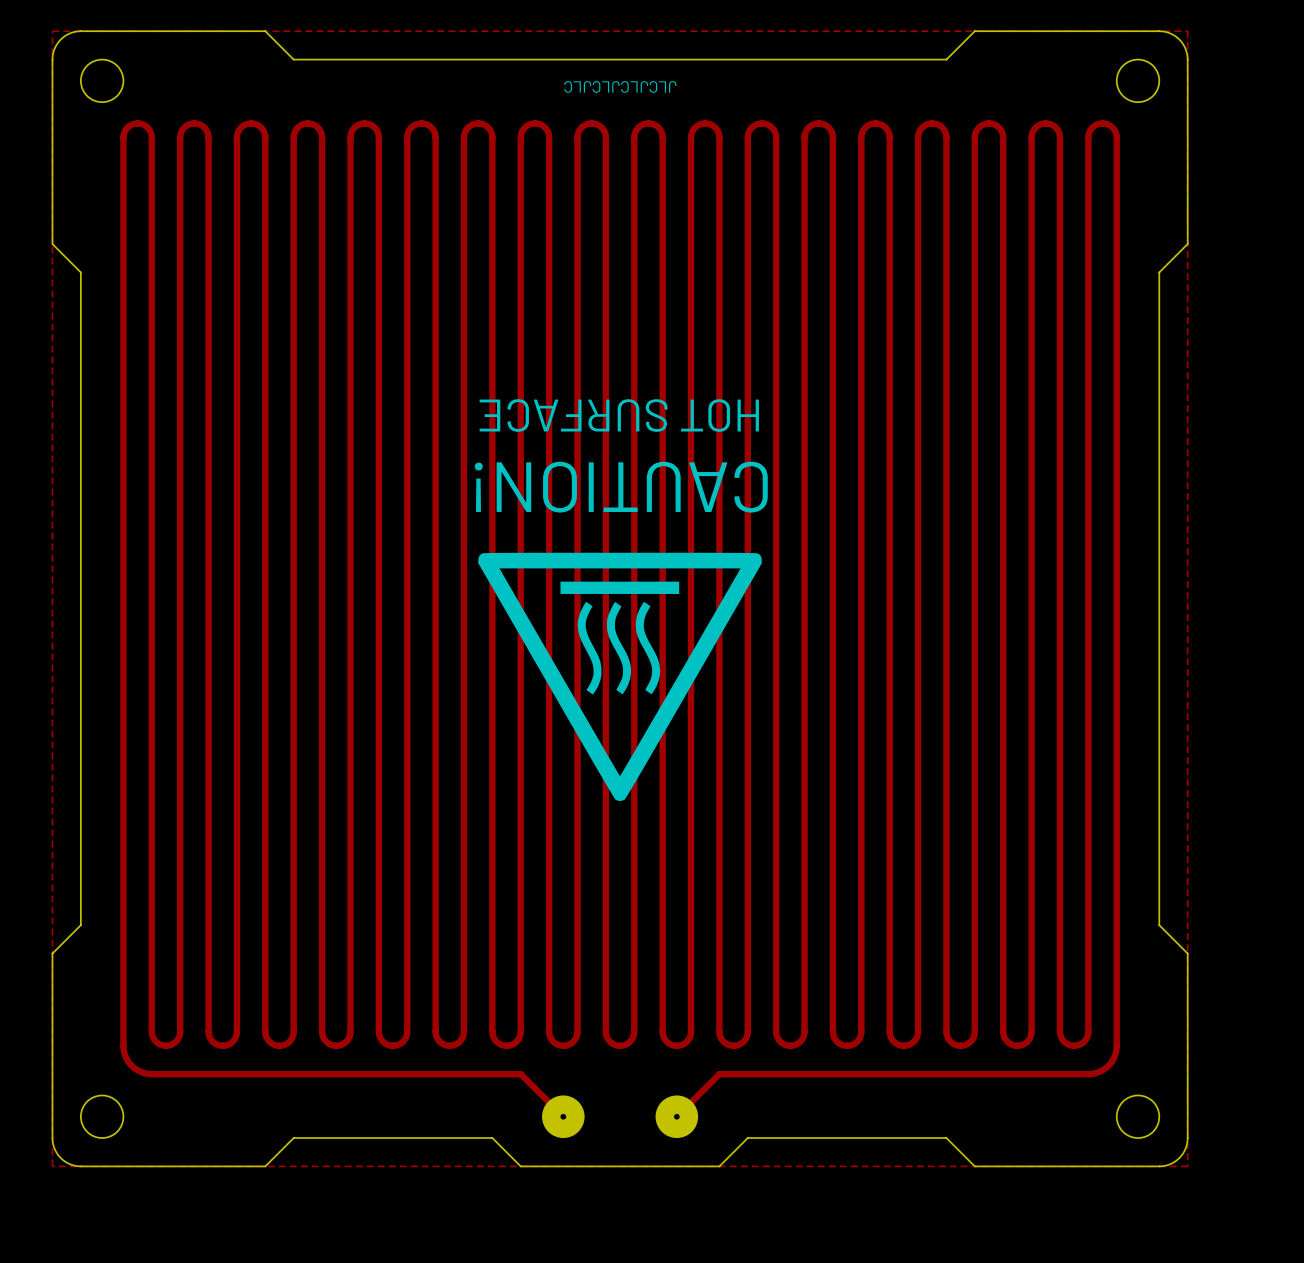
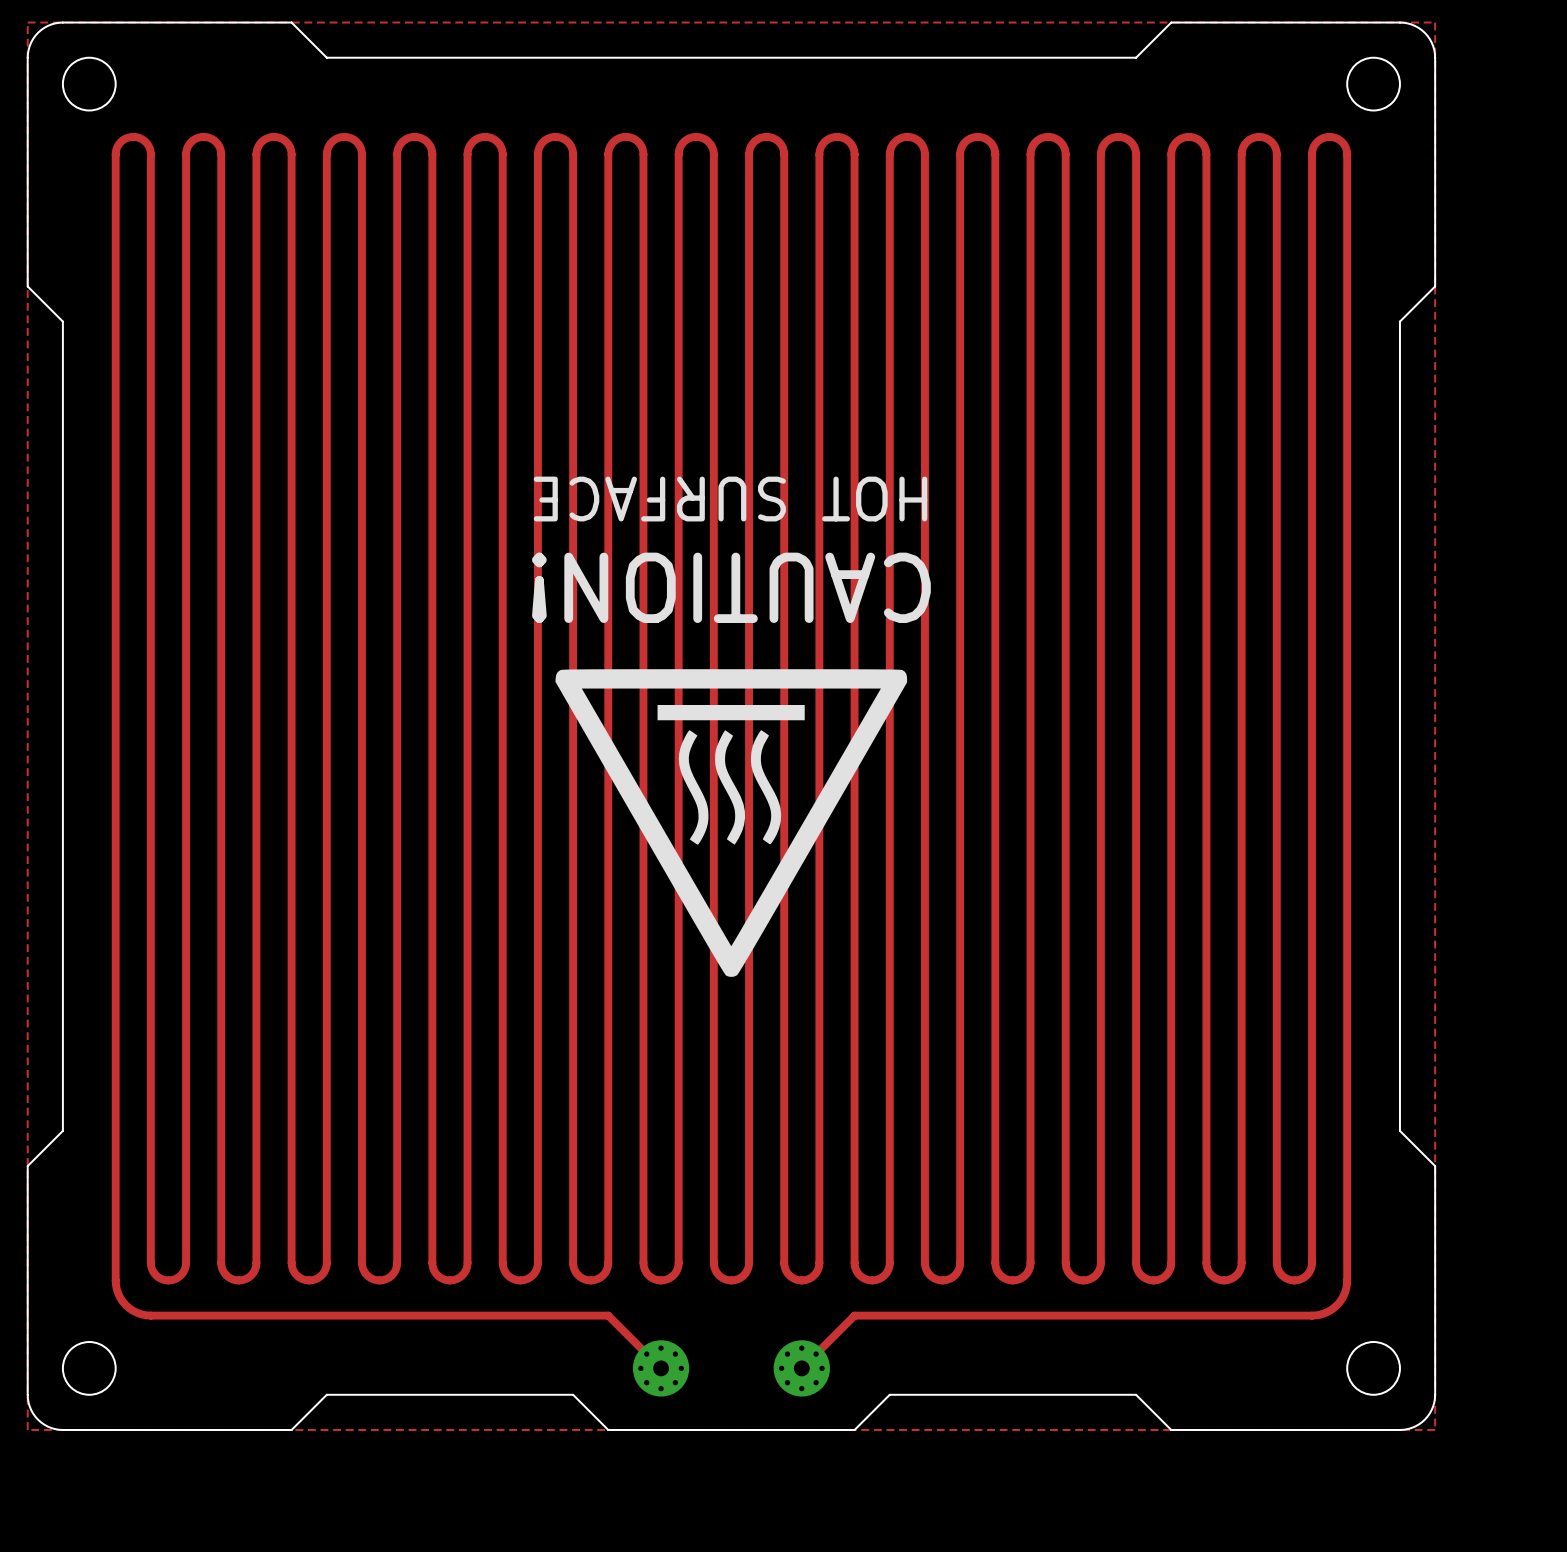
text: JLCJLCJLCJLC (620, 86) -> none
part footprint: [542, 1095, 585, 1139] -> [632, 1340, 690, 1397]
part footprint: [655, 1095, 699, 1139] -> [773, 1340, 830, 1397]

